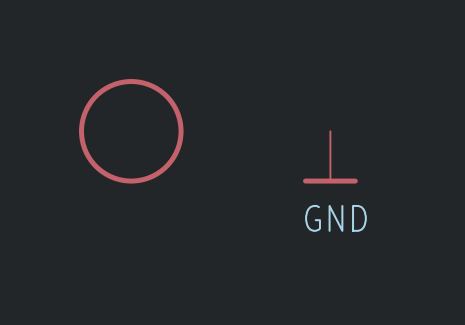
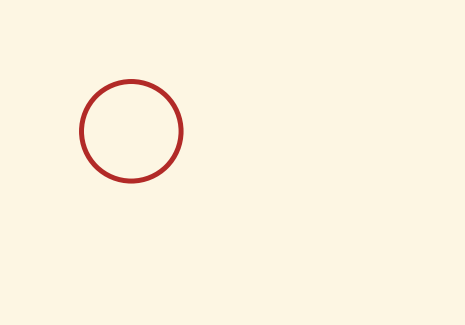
power symbol: GND (330, 157) -> none

